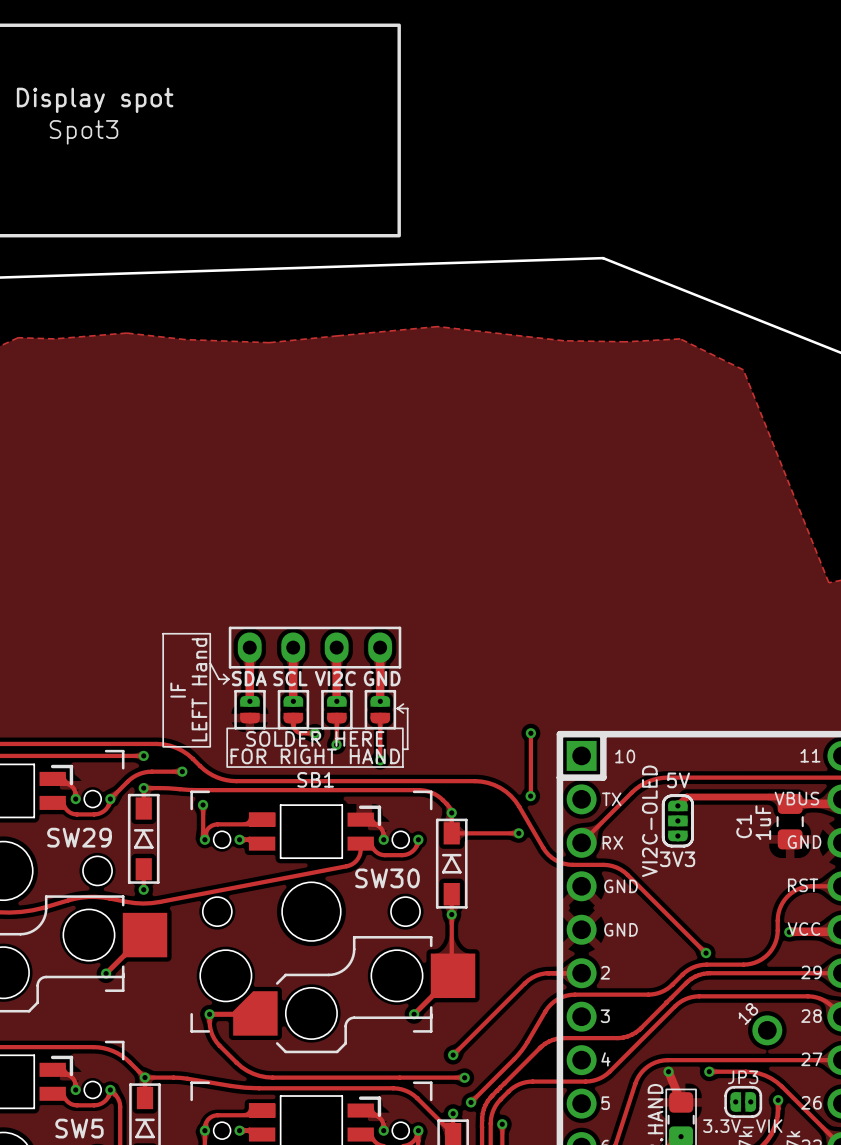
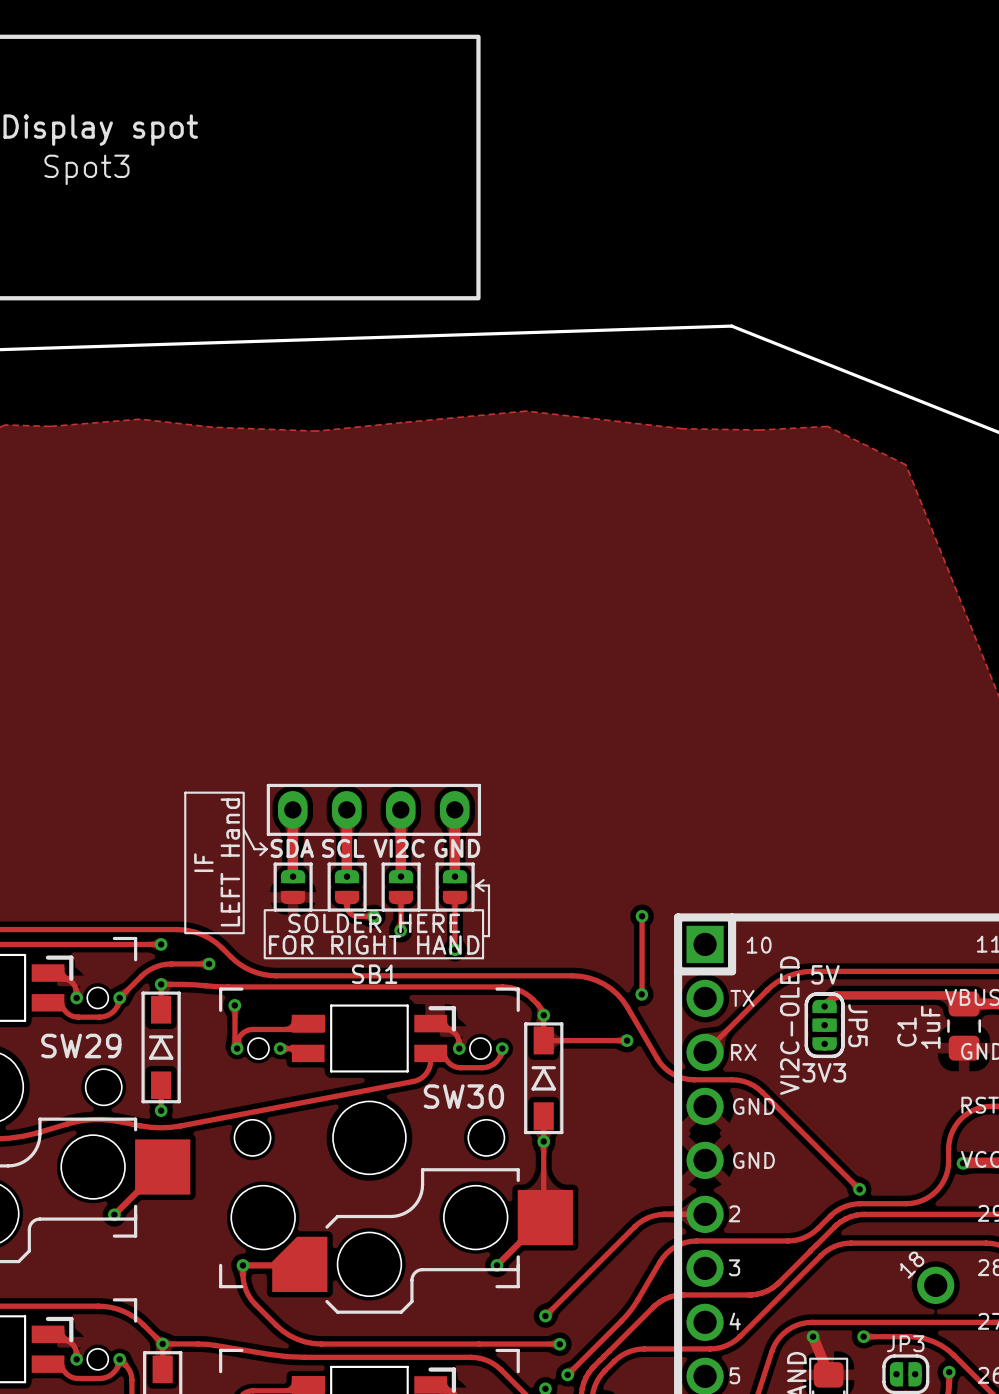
part text: none -> JP5 (857, 1025)

